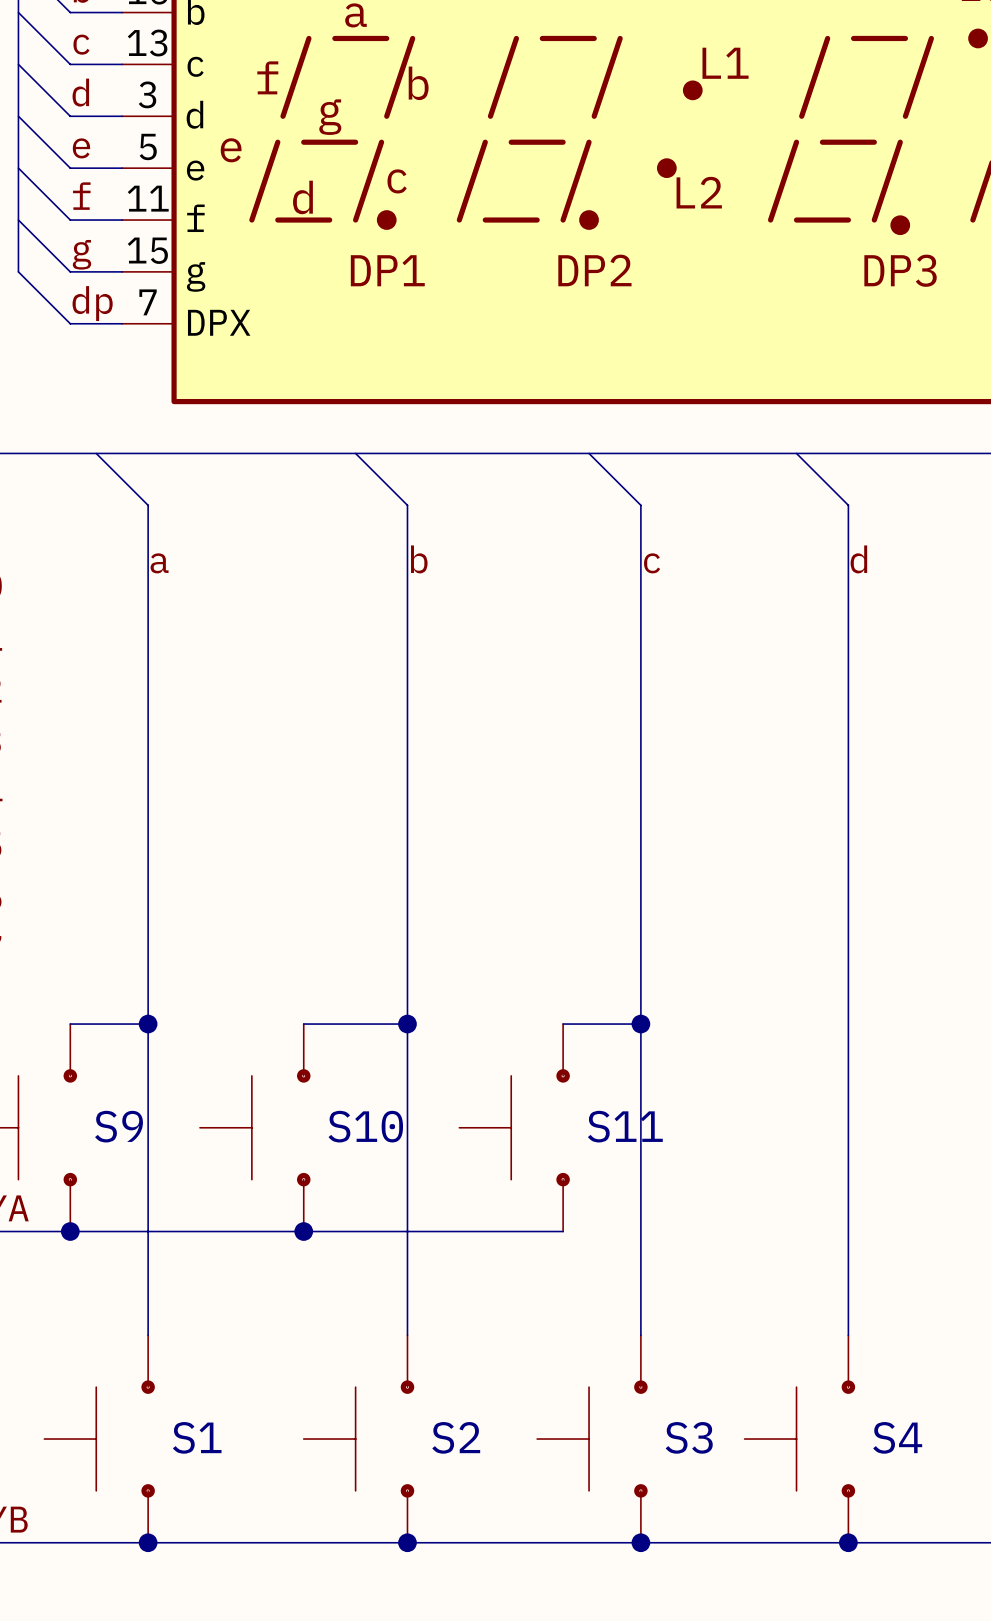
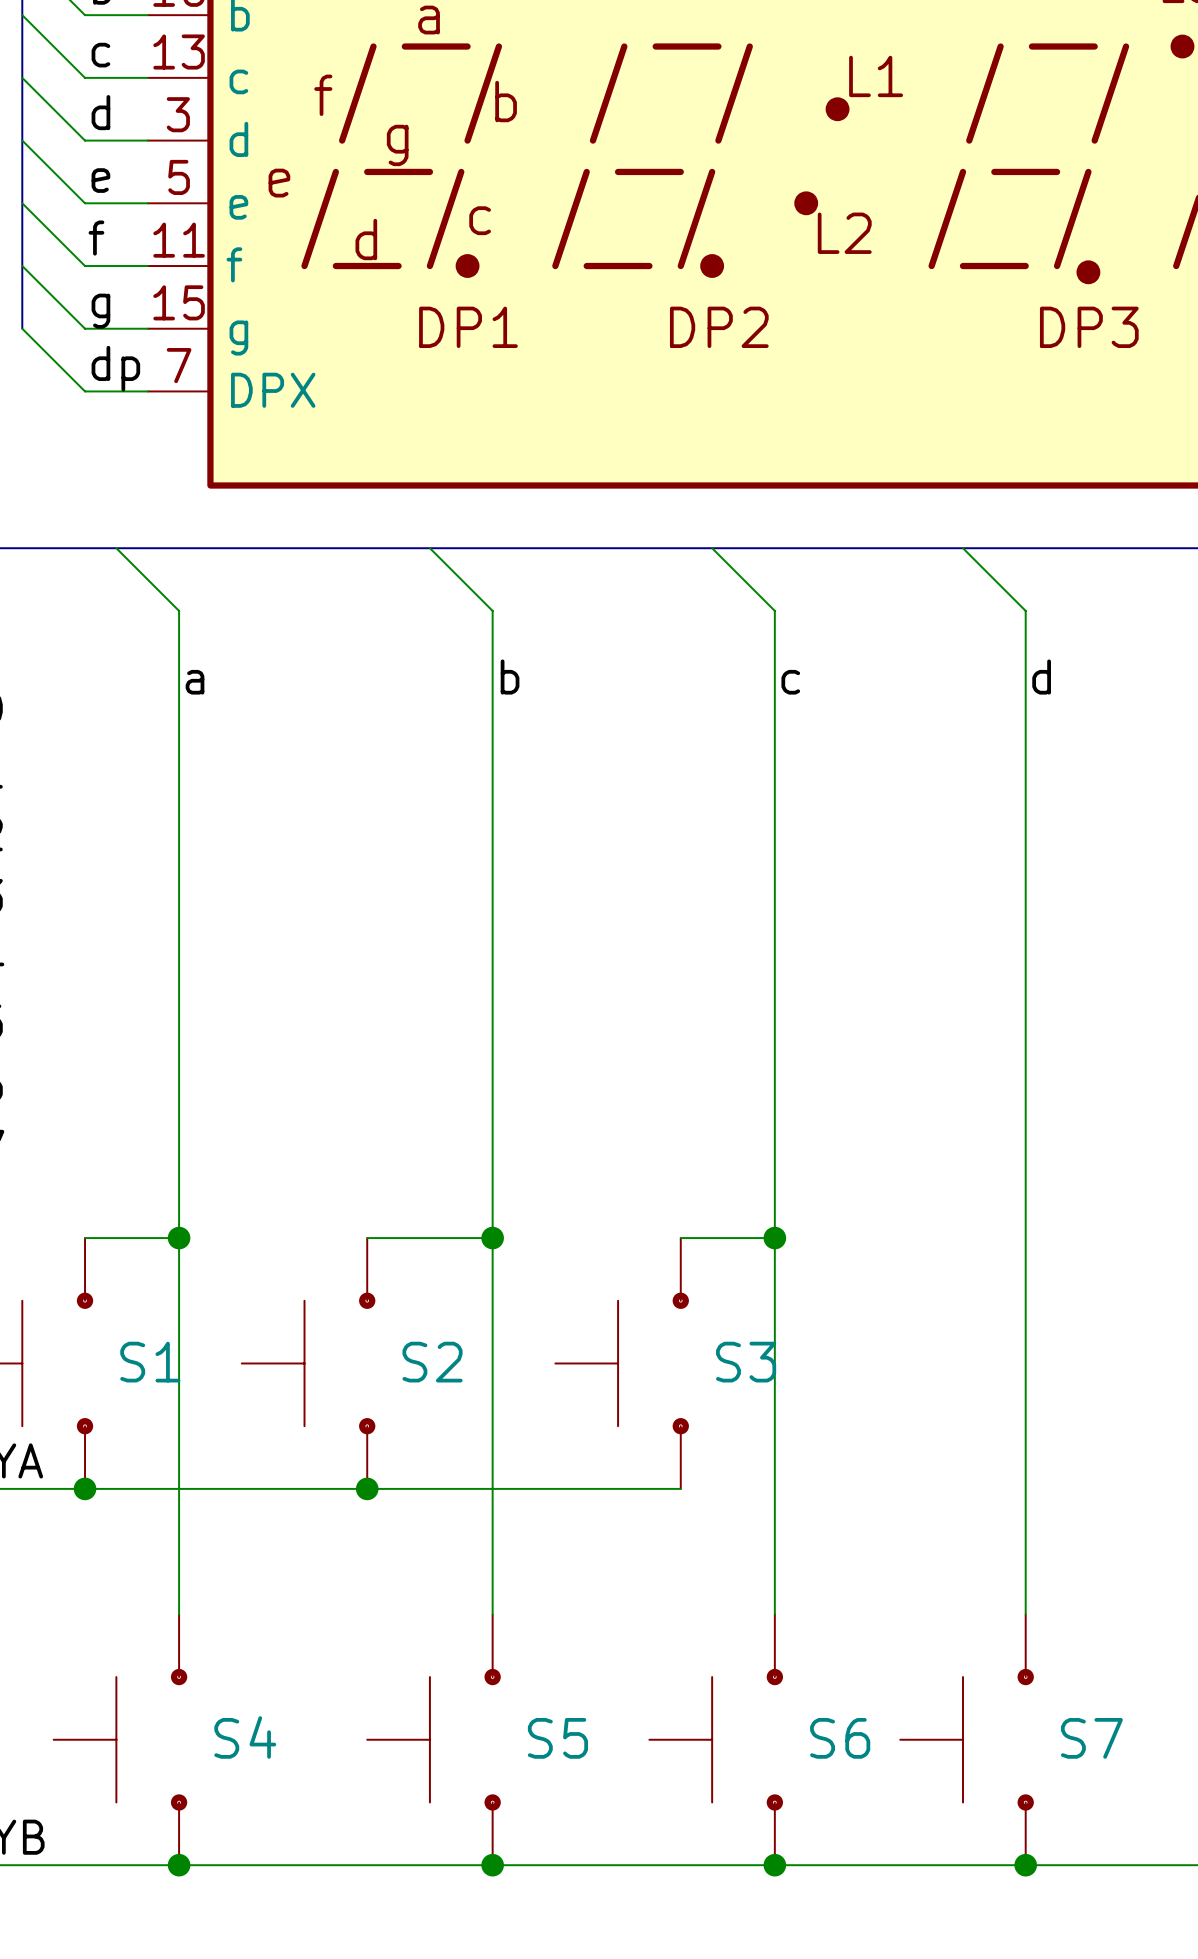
S9 name: S9 (119, 1126) -> S1 (150, 1362)
S10 name: S10 (365, 1126) -> S2 (432, 1362)
S11 name: S11 (625, 1126) -> S3 (746, 1362)
S1 name: S1 (197, 1437) -> S4 (245, 1737)
S2 name: S2 (456, 1437) -> S5 (557, 1738)
S3 name: S3 (689, 1437) -> S6 (840, 1738)
S4 name: S4 (897, 1437) -> S7 (1091, 1738)

